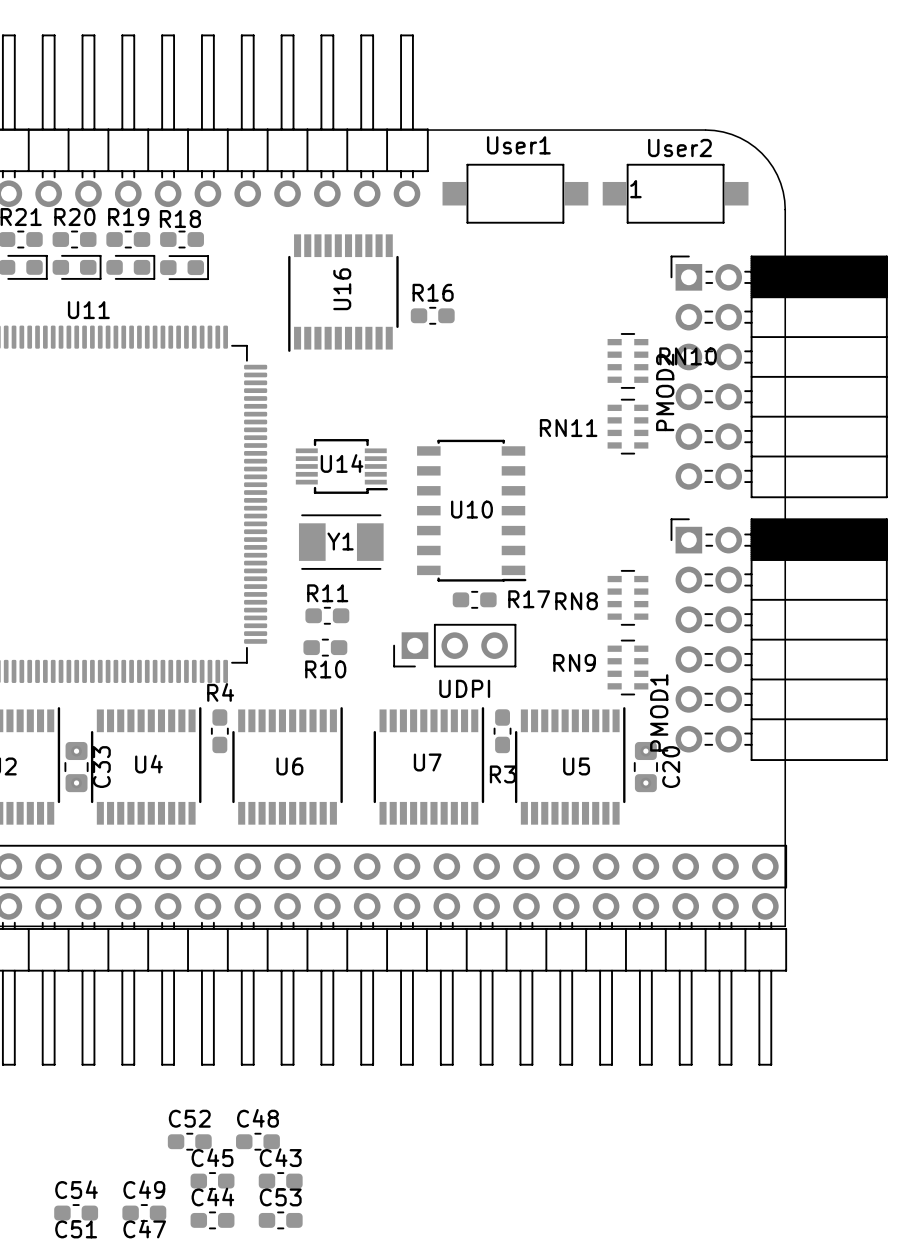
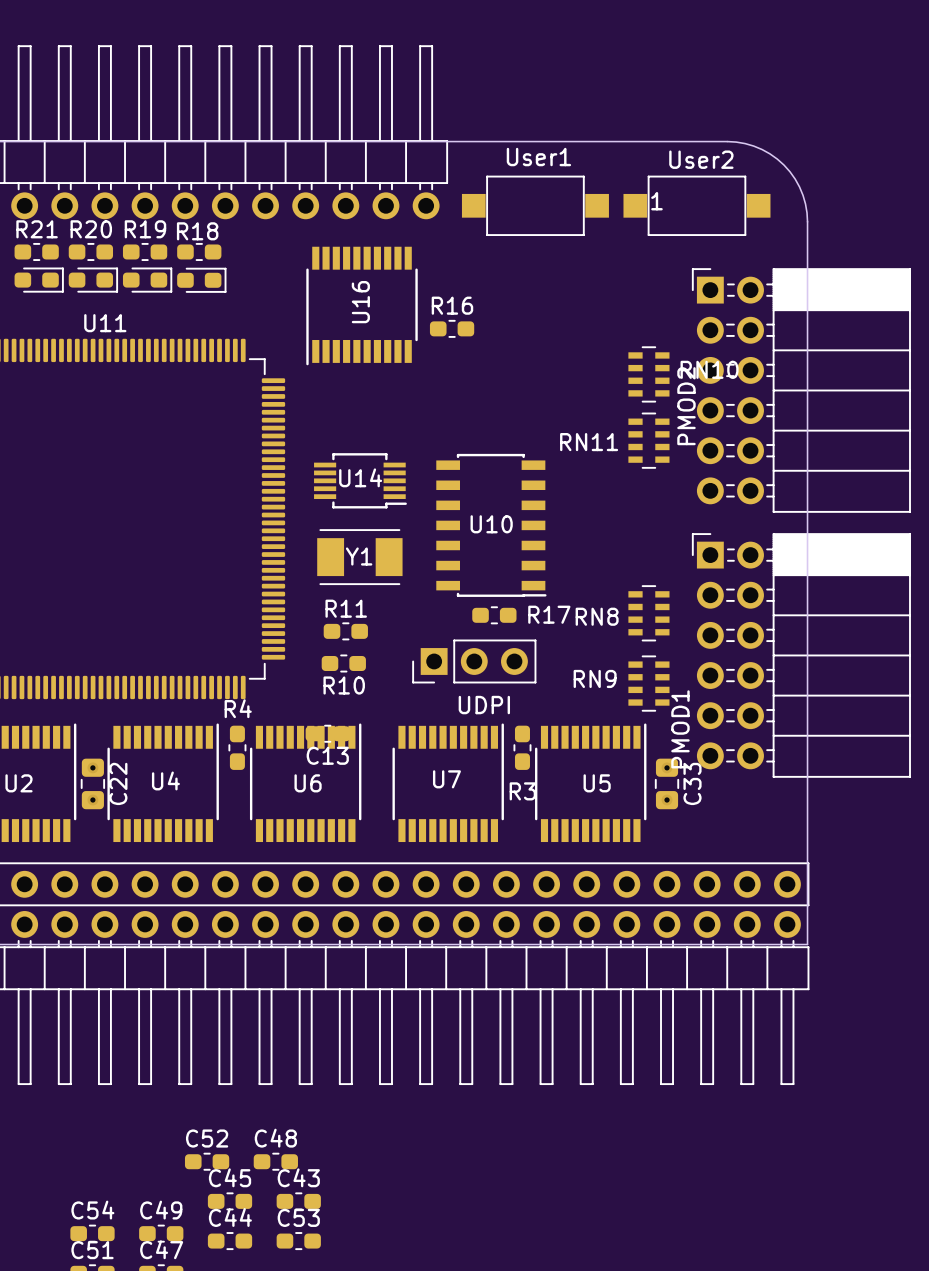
C13: none -> (327, 733)
C33 name: C33 (101, 767) -> C22 (118, 783)
C20 name: C20 (671, 767) -> C33 (692, 783)

